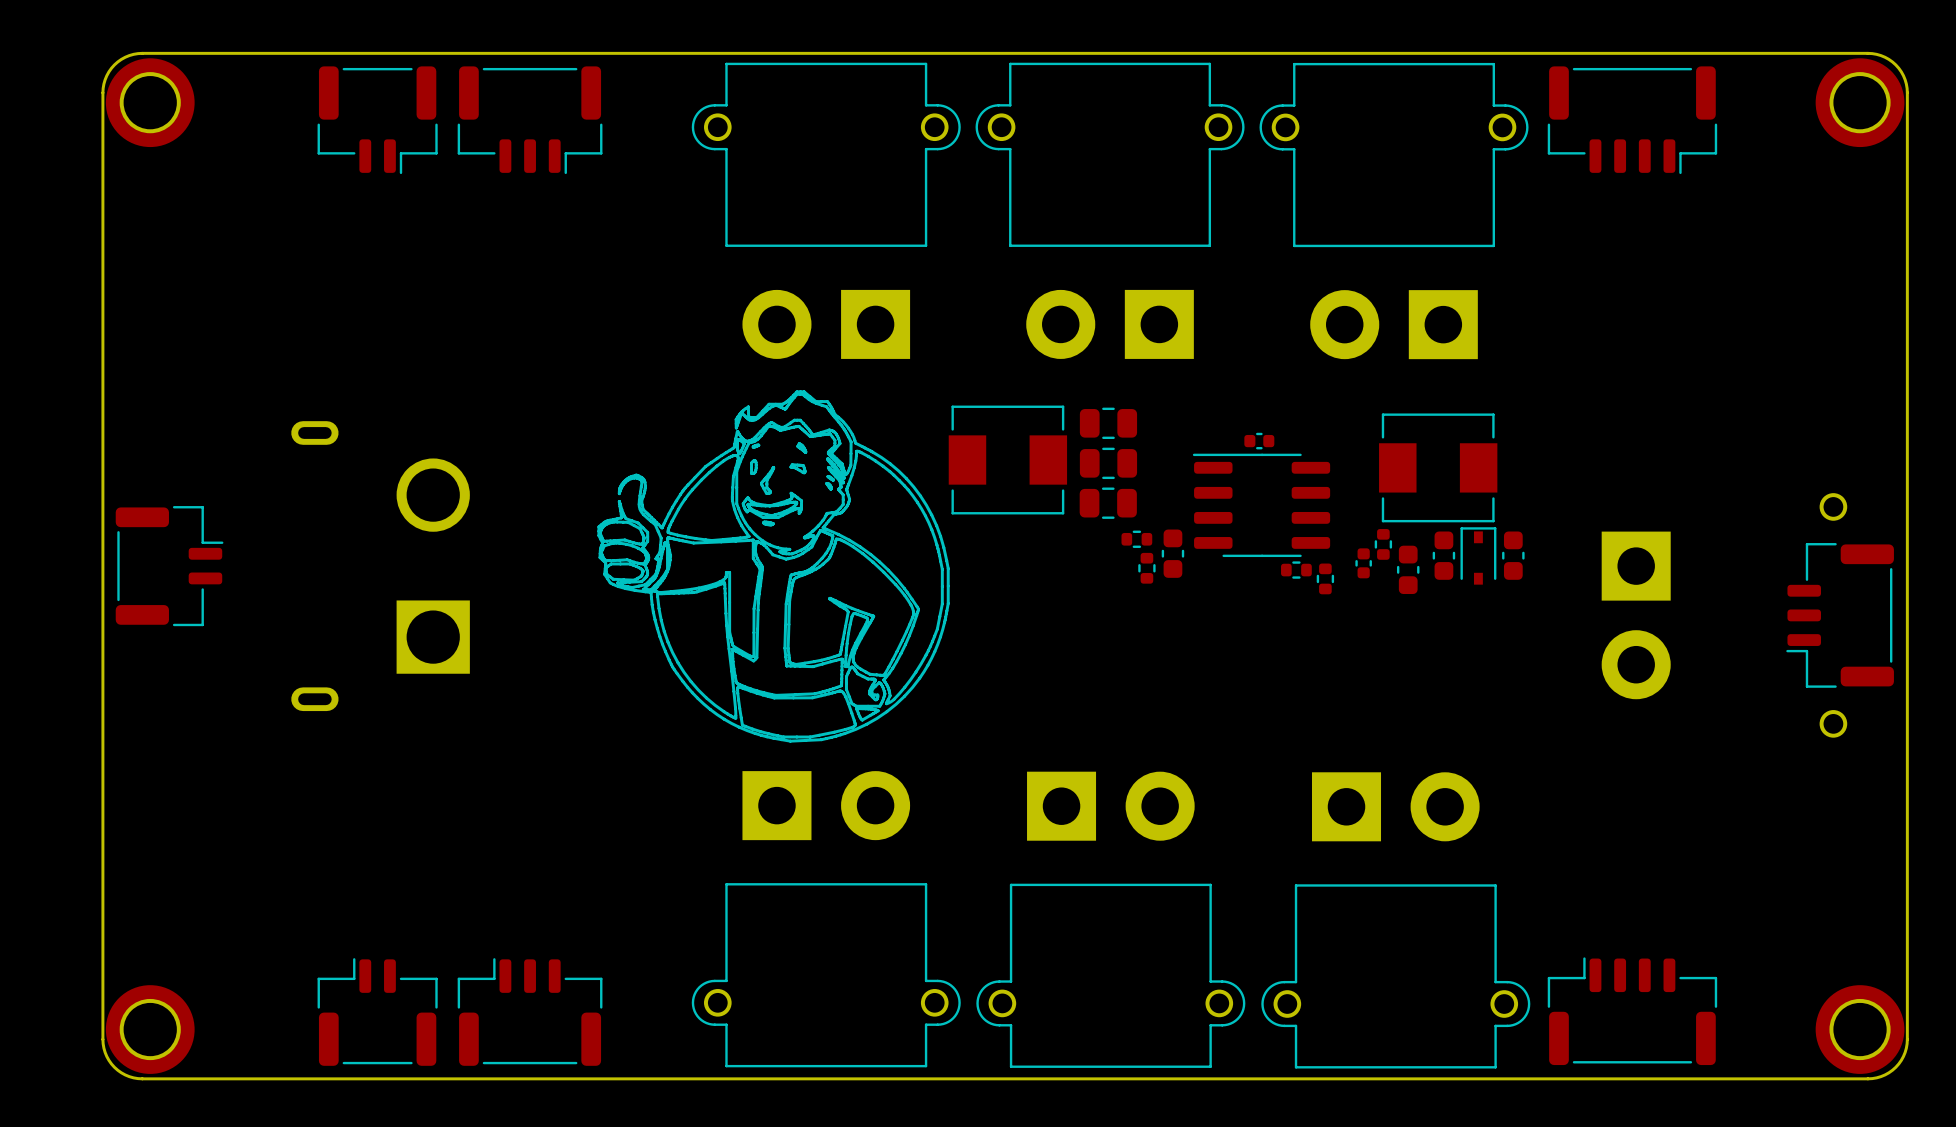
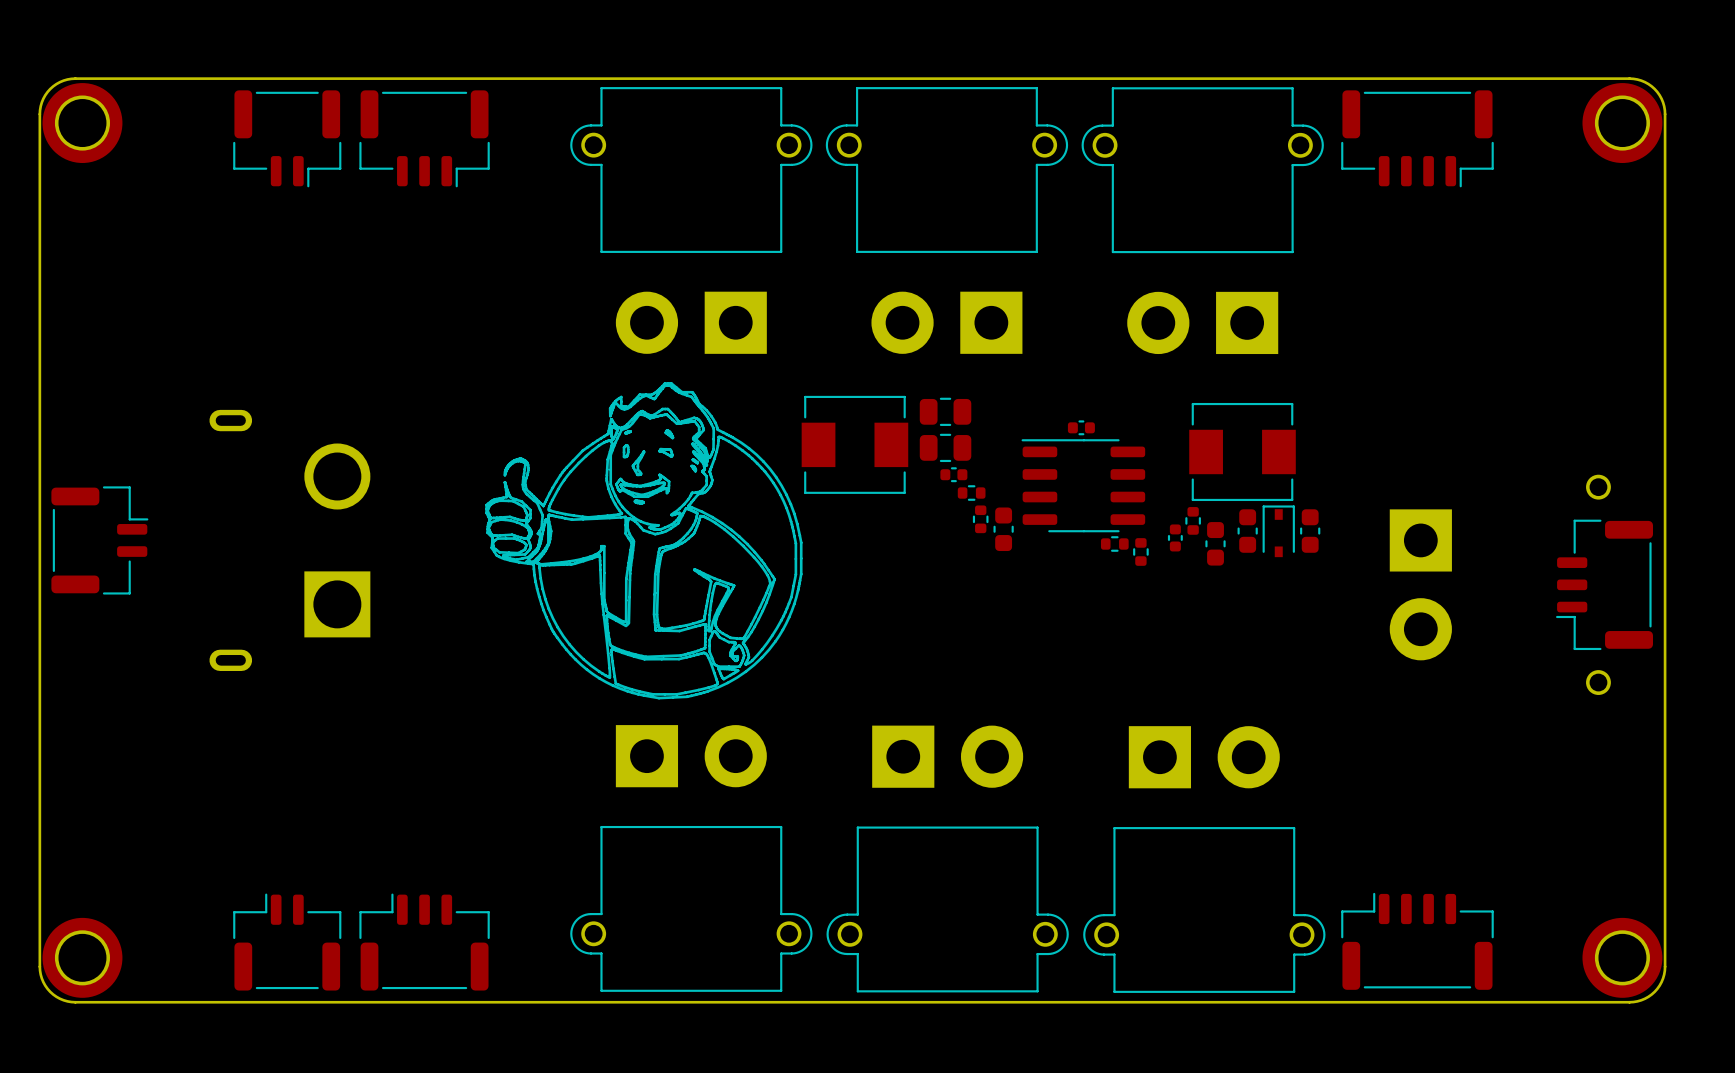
part footprint: [1079, 487, 1137, 519] -> [940, 467, 968, 483]
part rotation: 0° (1136, 539) -> 90° clockwise (980, 519)
part rotation: 0° (1146, 568) -> 90° clockwise (971, 493)
part position: (1146, 568) -> (971, 493)

